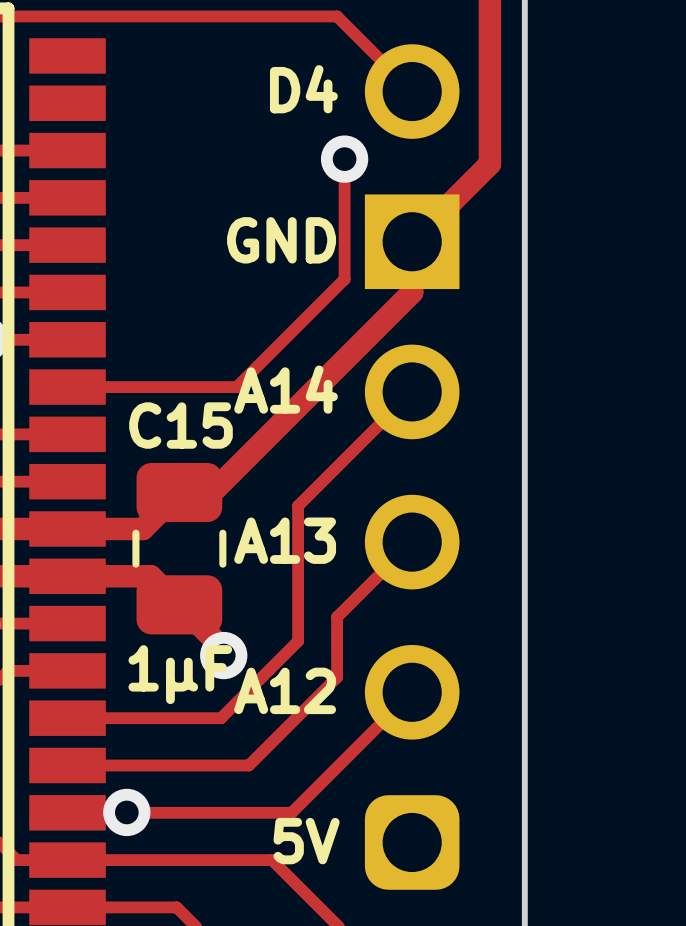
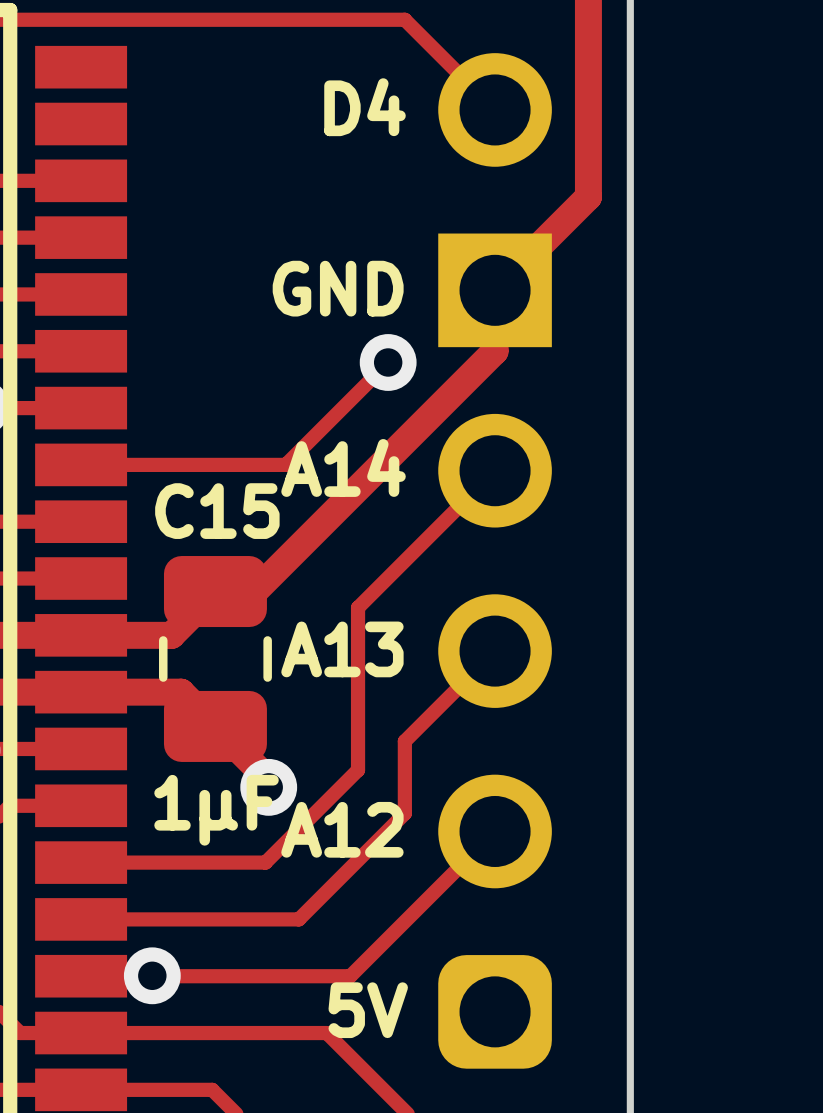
track: (344, 159) (344, 279) (236, 387) -> (388, 362) (285, 464)
via position: (344, 159) -> (388, 362)

